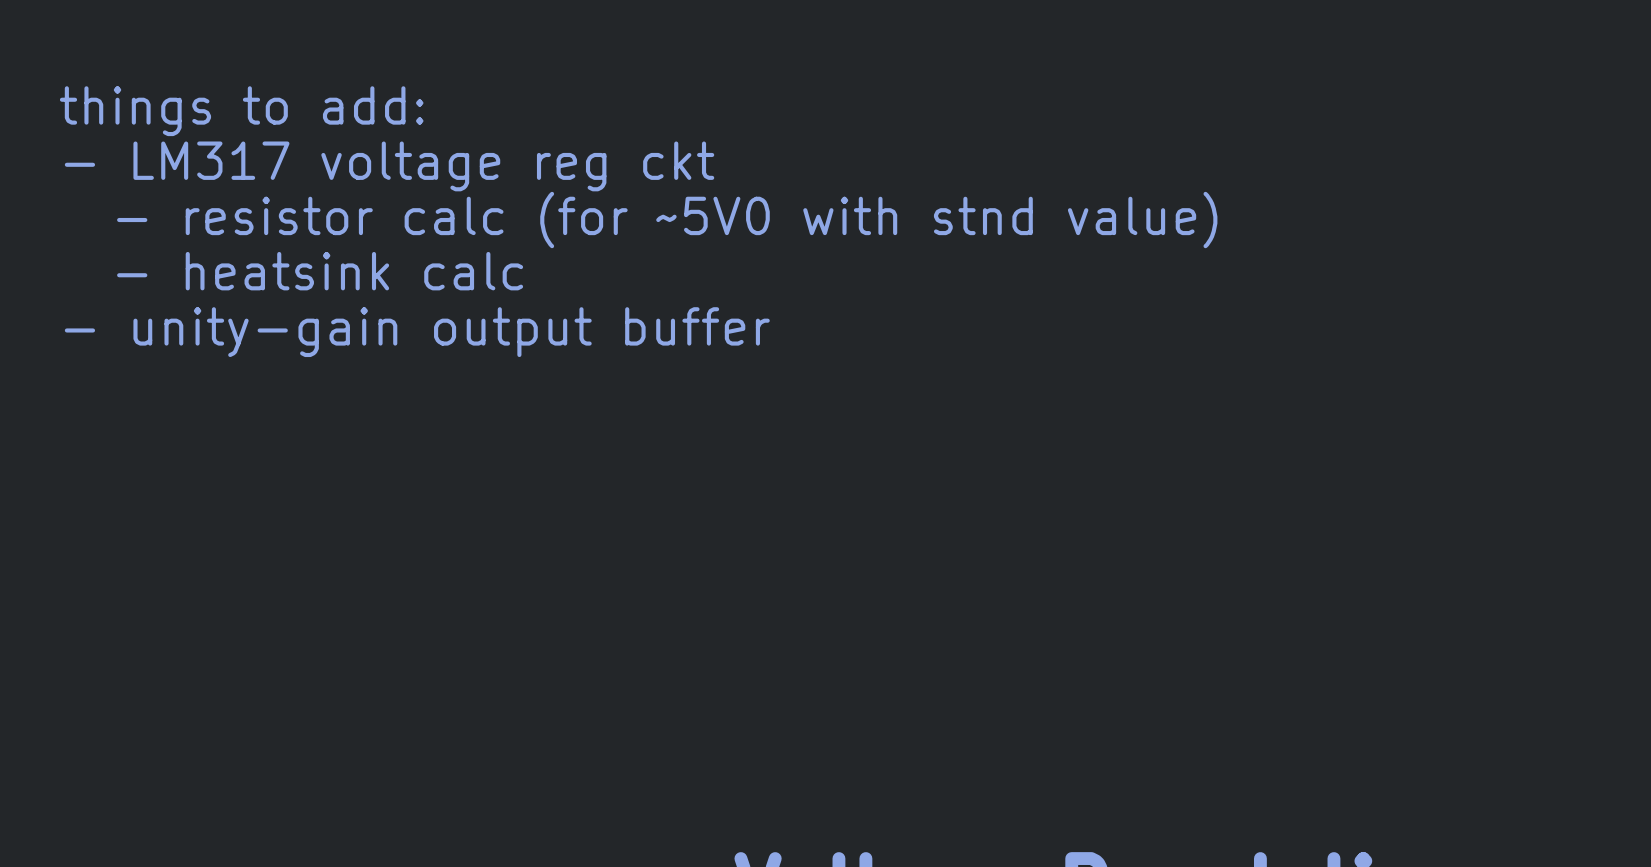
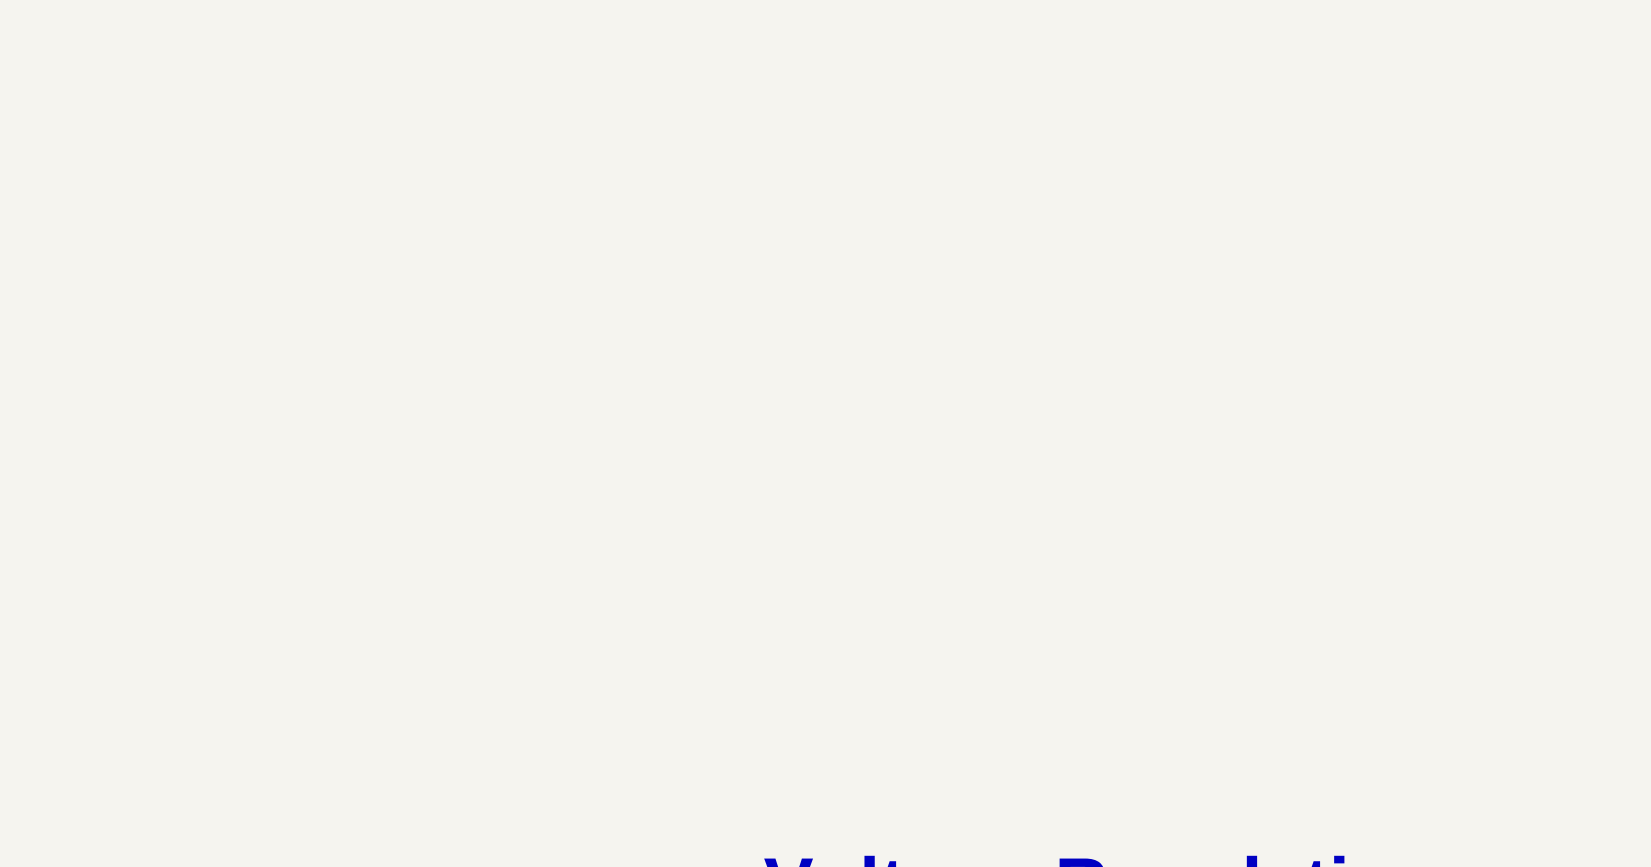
text: things to add: (241, 111) -> none
text: - LM317 voltage reg ckt (389, 166) -> none
text: - resistor calc (for ~5V0 with stnd value) (667, 220) -> none
text: - heatsink calc (320, 271) -> none
text: - unity-gain output buffer (417, 332) -> none

